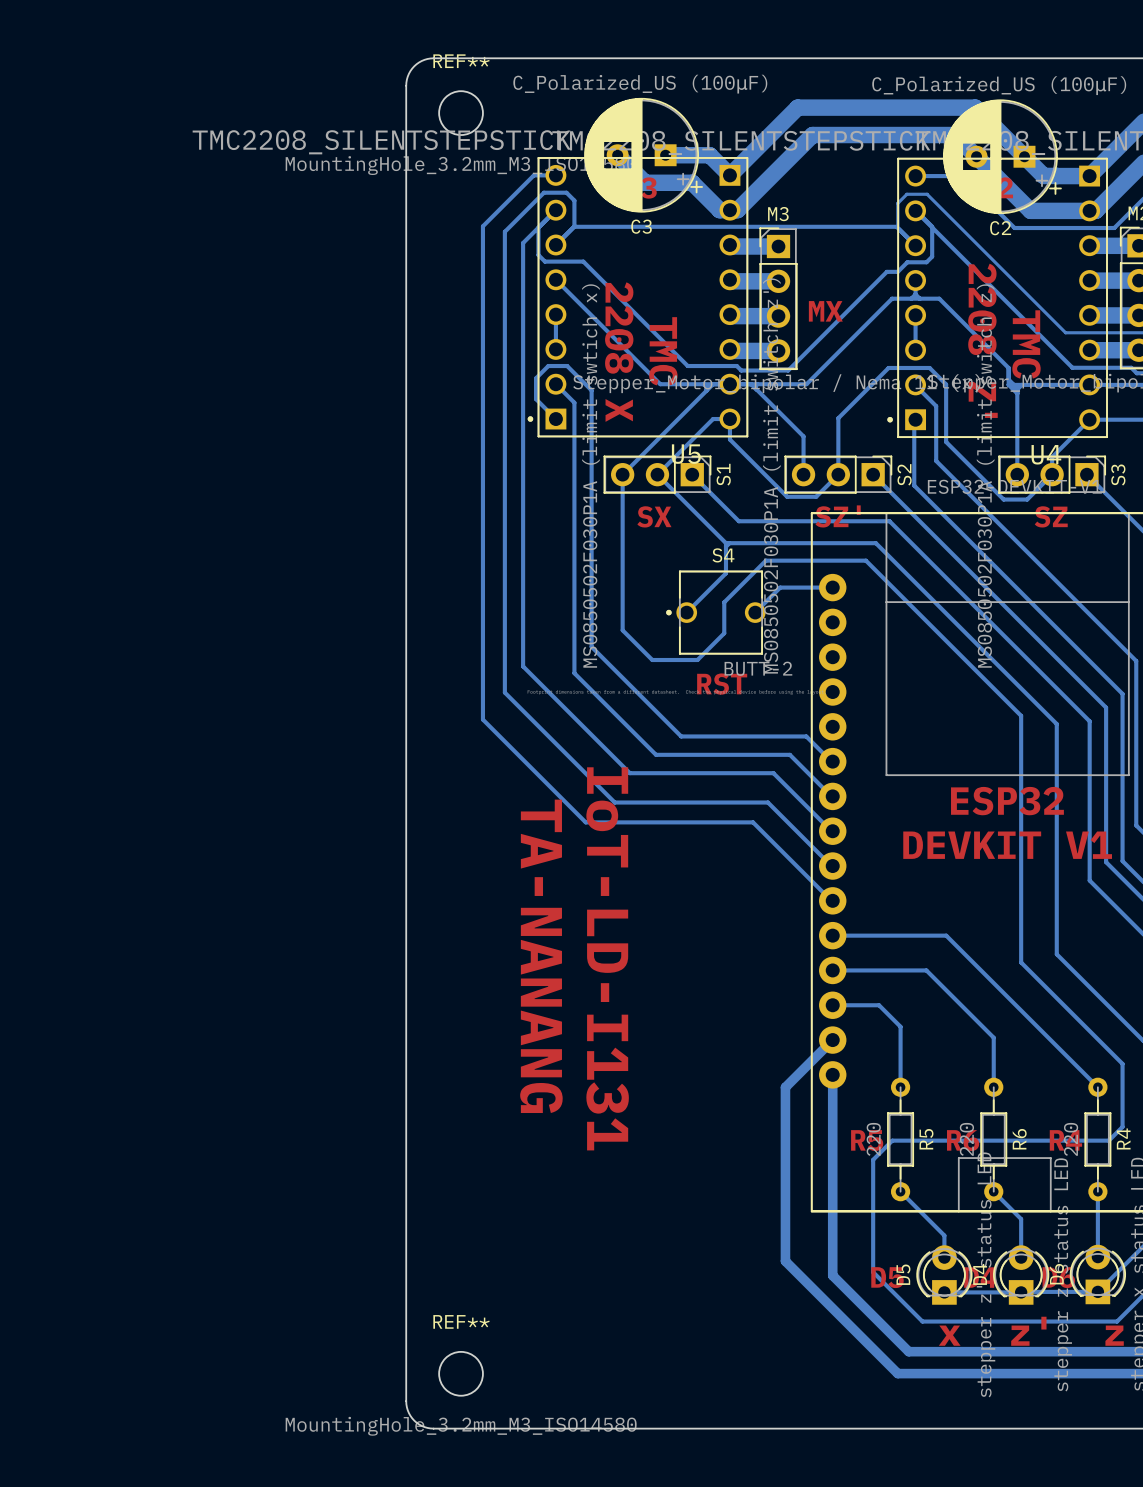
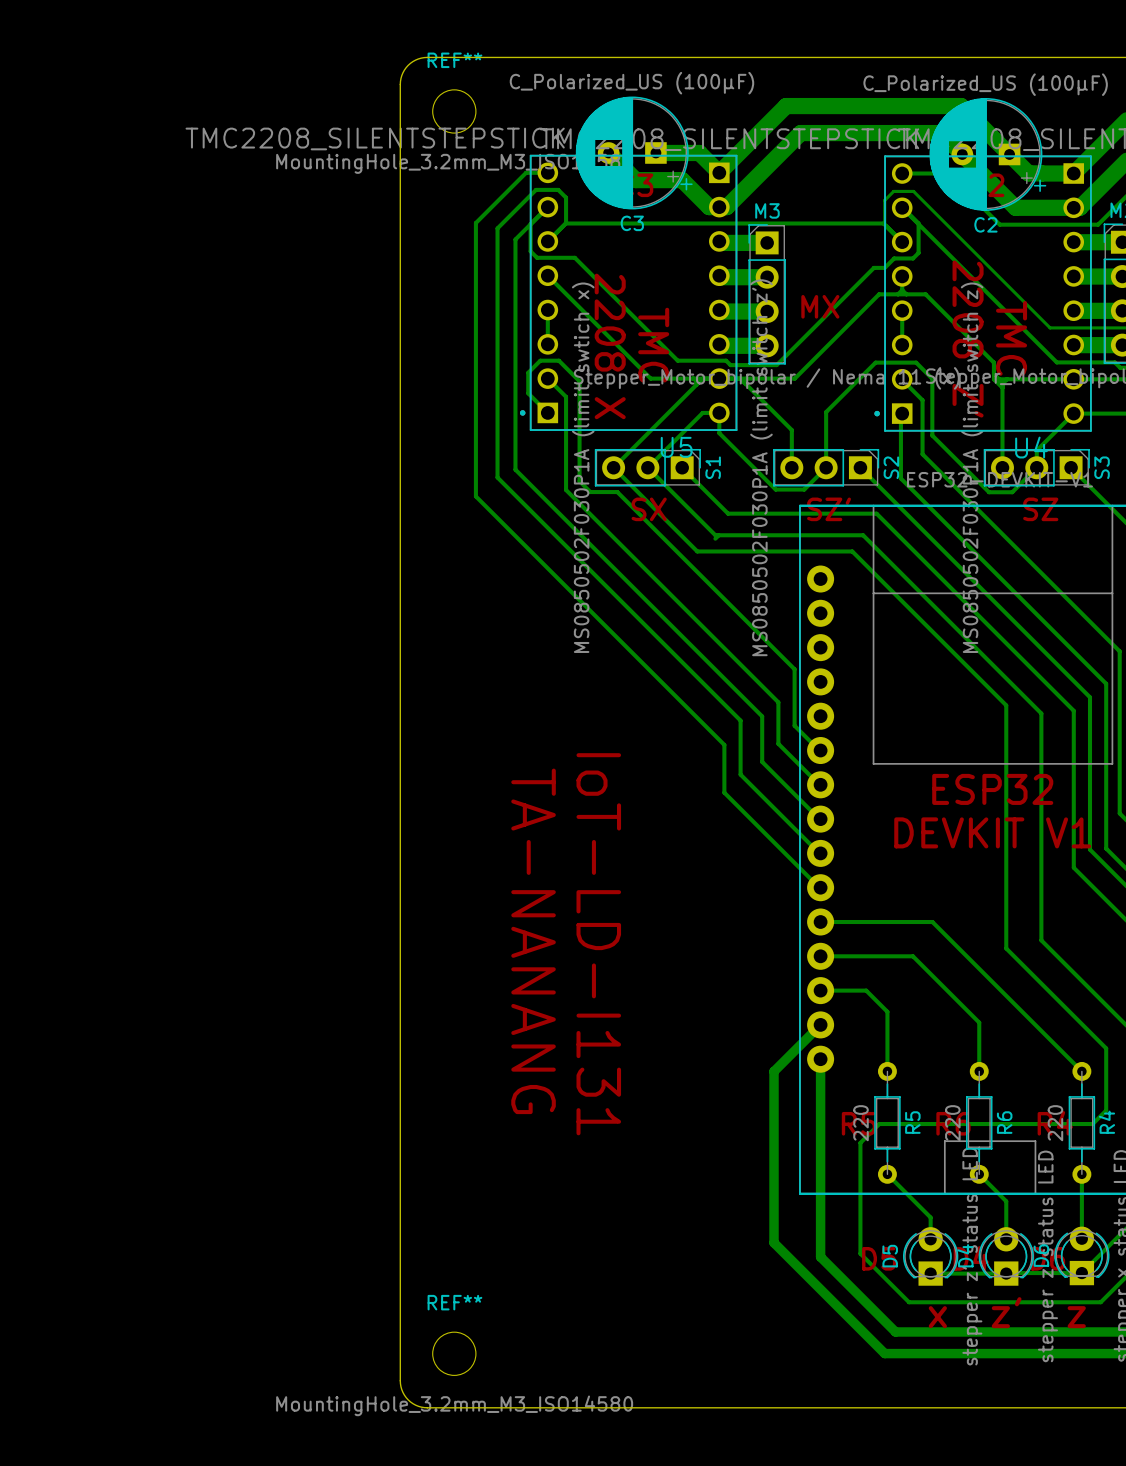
bottom track: (588, 386) (591, 390) (591, 646) (681, 736) (806, 736) -> (579, 381) (579, 481) (590, 492) (617, 492) (794, 669) (794, 725)
bottom track: (622, 474) (622, 630) (652, 660) (697, 660) (724, 633) (724, 602) (765, 560) (865, 560) -> (613, 467) (697, 551) (853, 552)
bottom track: (523, 476) (523, 666) (629, 773) (773, 773) -> (515, 469) (762, 716) (762, 761)
bottom track: (504, 484) (504, 692) (614, 802) (767, 802) -> (497, 477) (740, 720) (740, 774) (756, 790)
bottom track: (574, 497) (574, 673) (656, 754) (789, 754) -> (566, 490) (778, 702) (778, 743)
bottom track: (482, 503) (482, 719) (585, 822) (753, 822) -> (475, 496) (724, 744) (724, 792) (742, 810)
bottom track: (725, 543) (725, 573) (686, 612) -> none
bottom track: (832, 587) (780, 587) (755, 612) -> none
S4: BUTT-2 (715, 612) -> none
text: RST (722, 684) -> none

